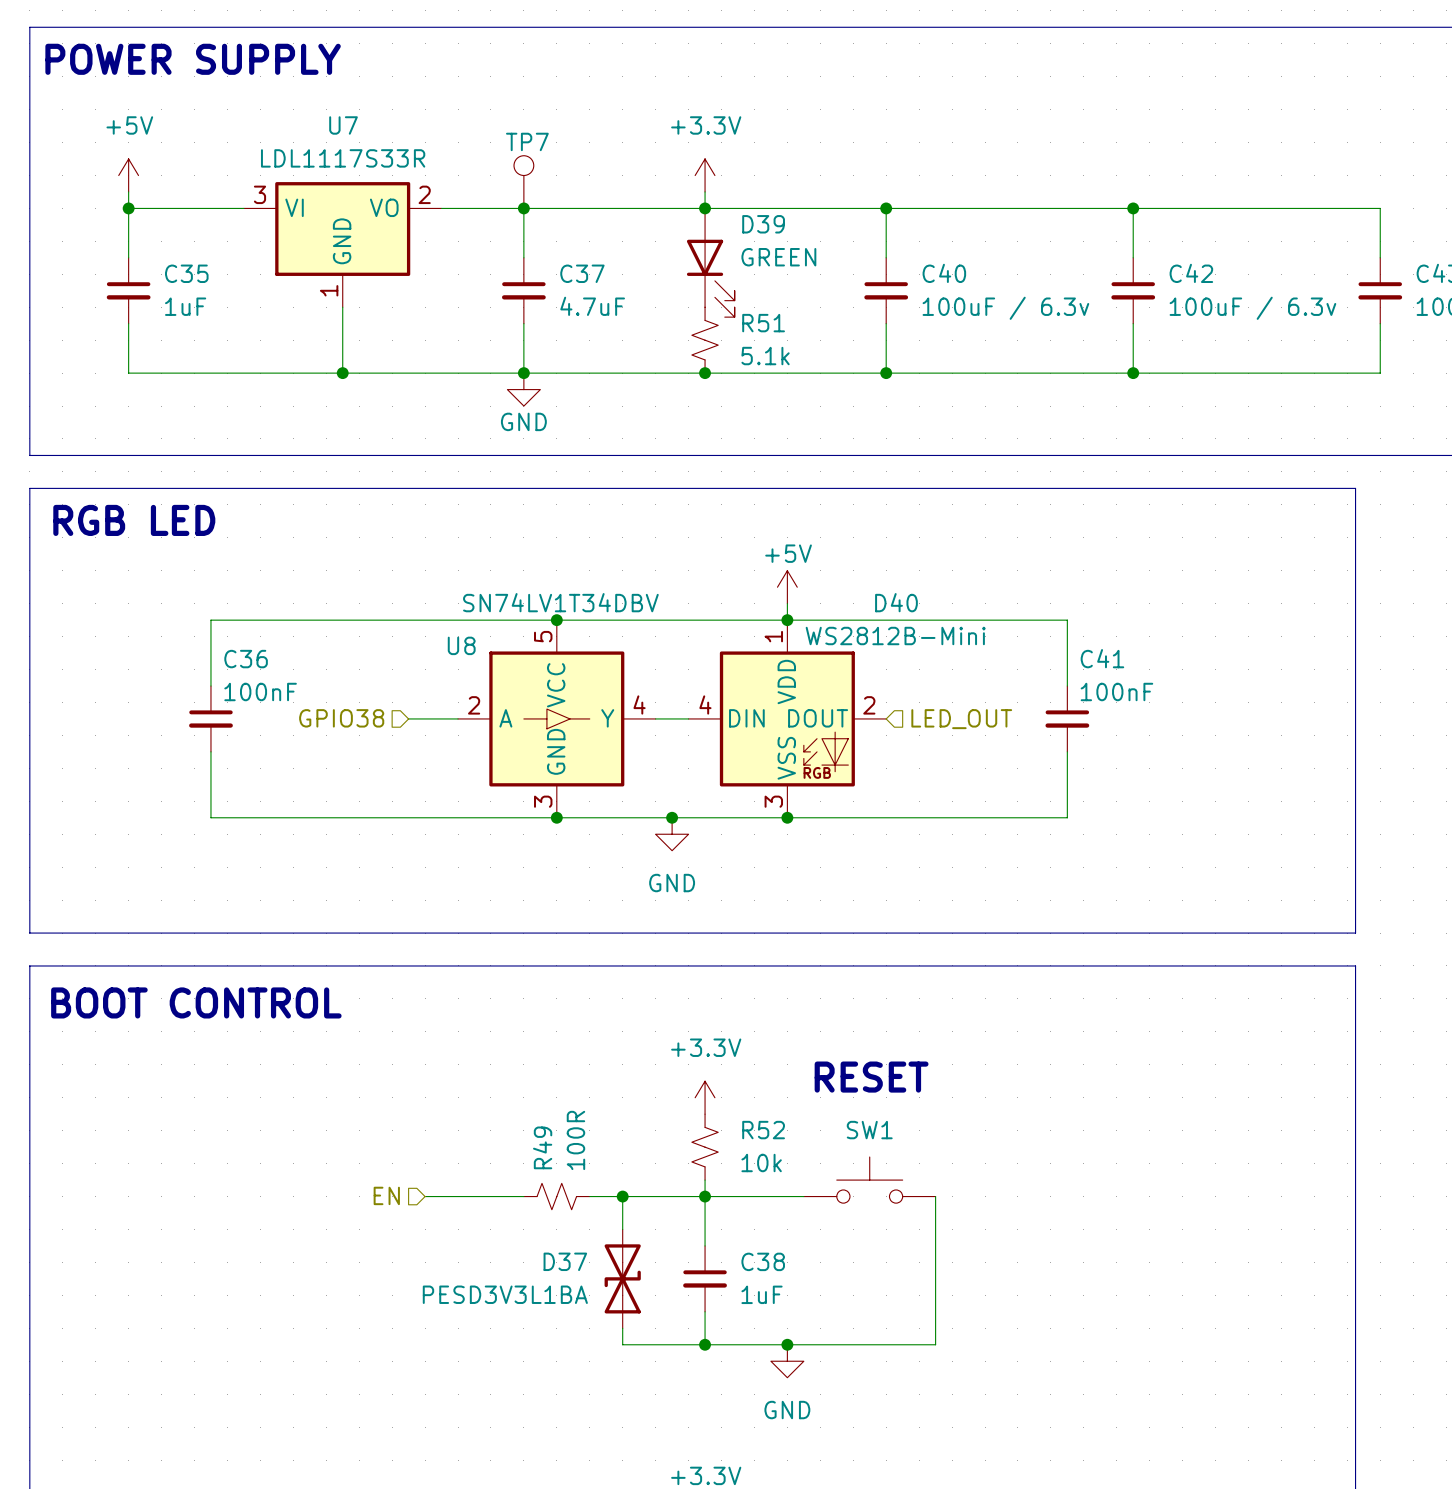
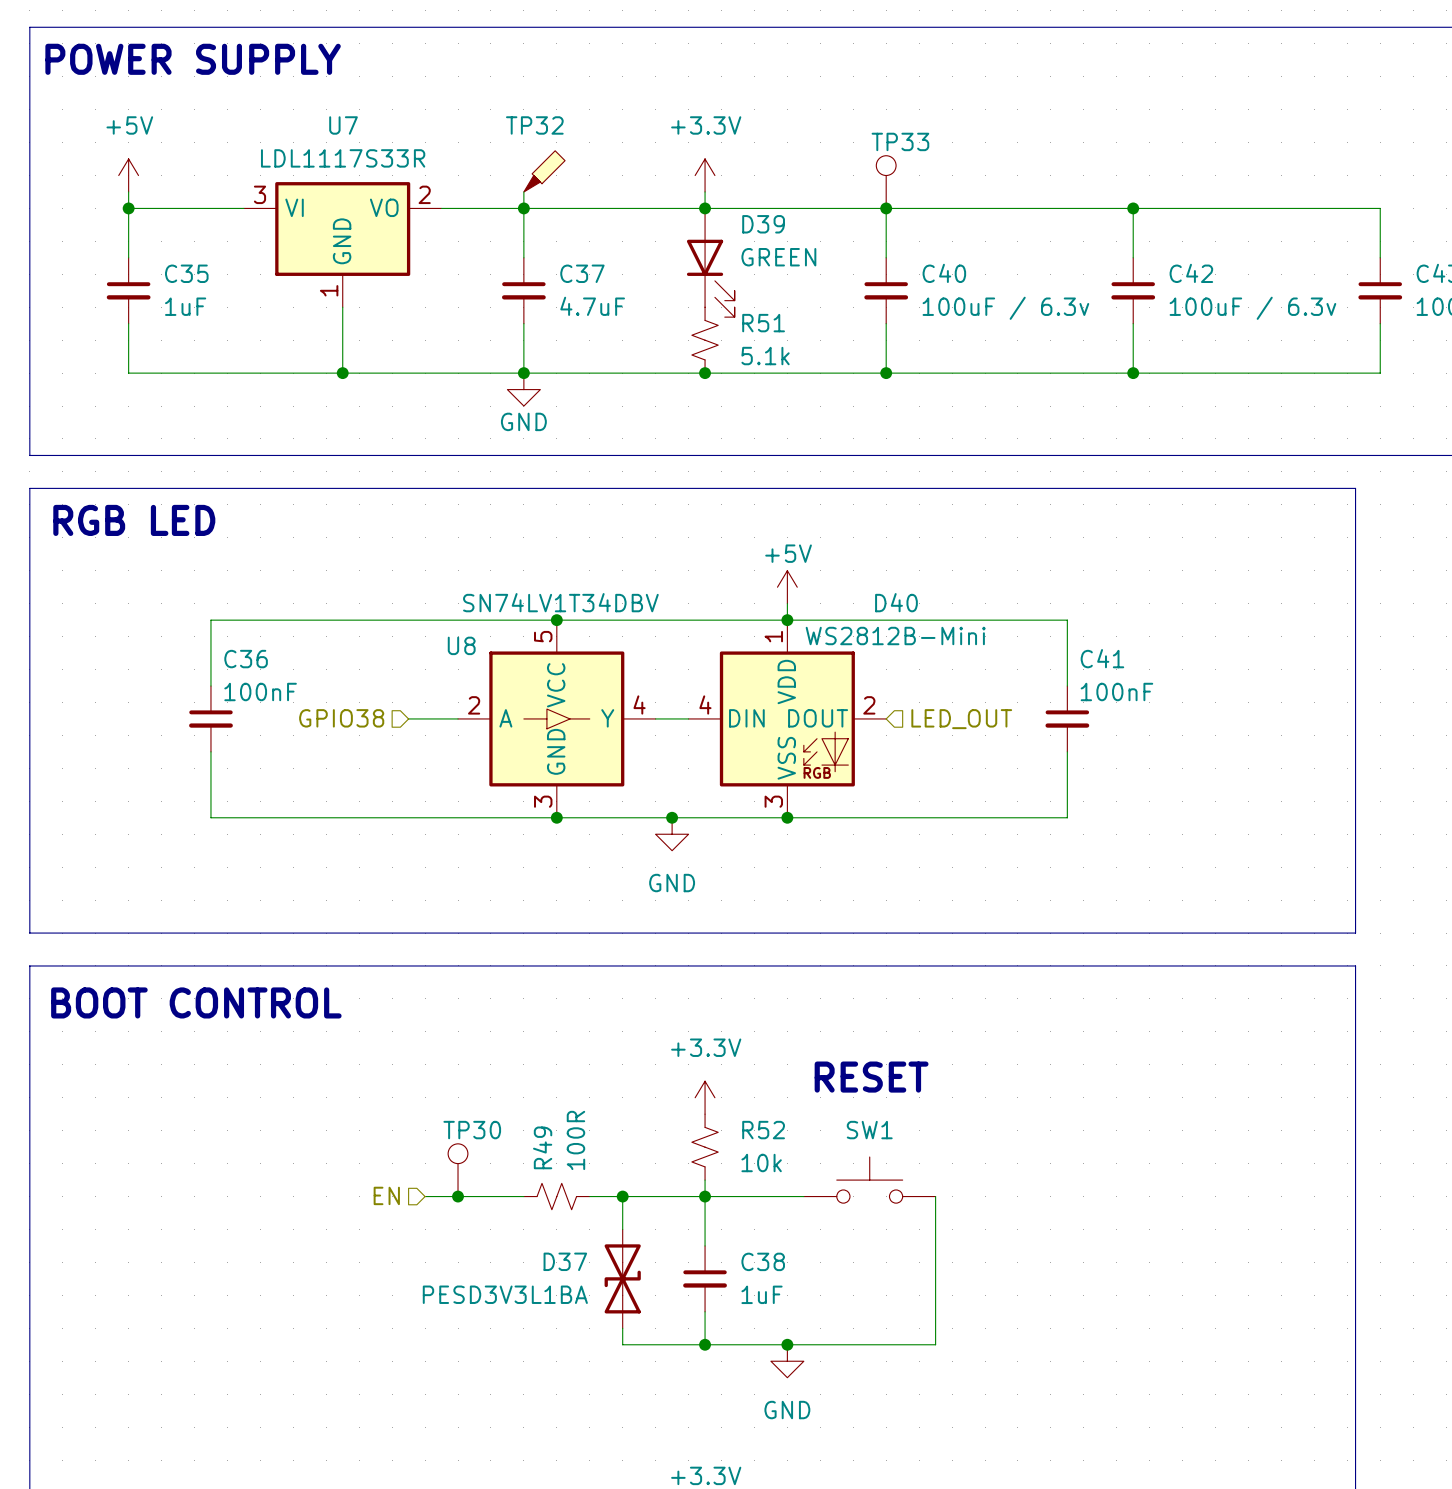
TP32: none -> (544, 171)
TP7: (523, 182) -> none
TP33: none -> (886, 182)
TP30: none -> (458, 1170)
junction: none -> (458, 1196)

